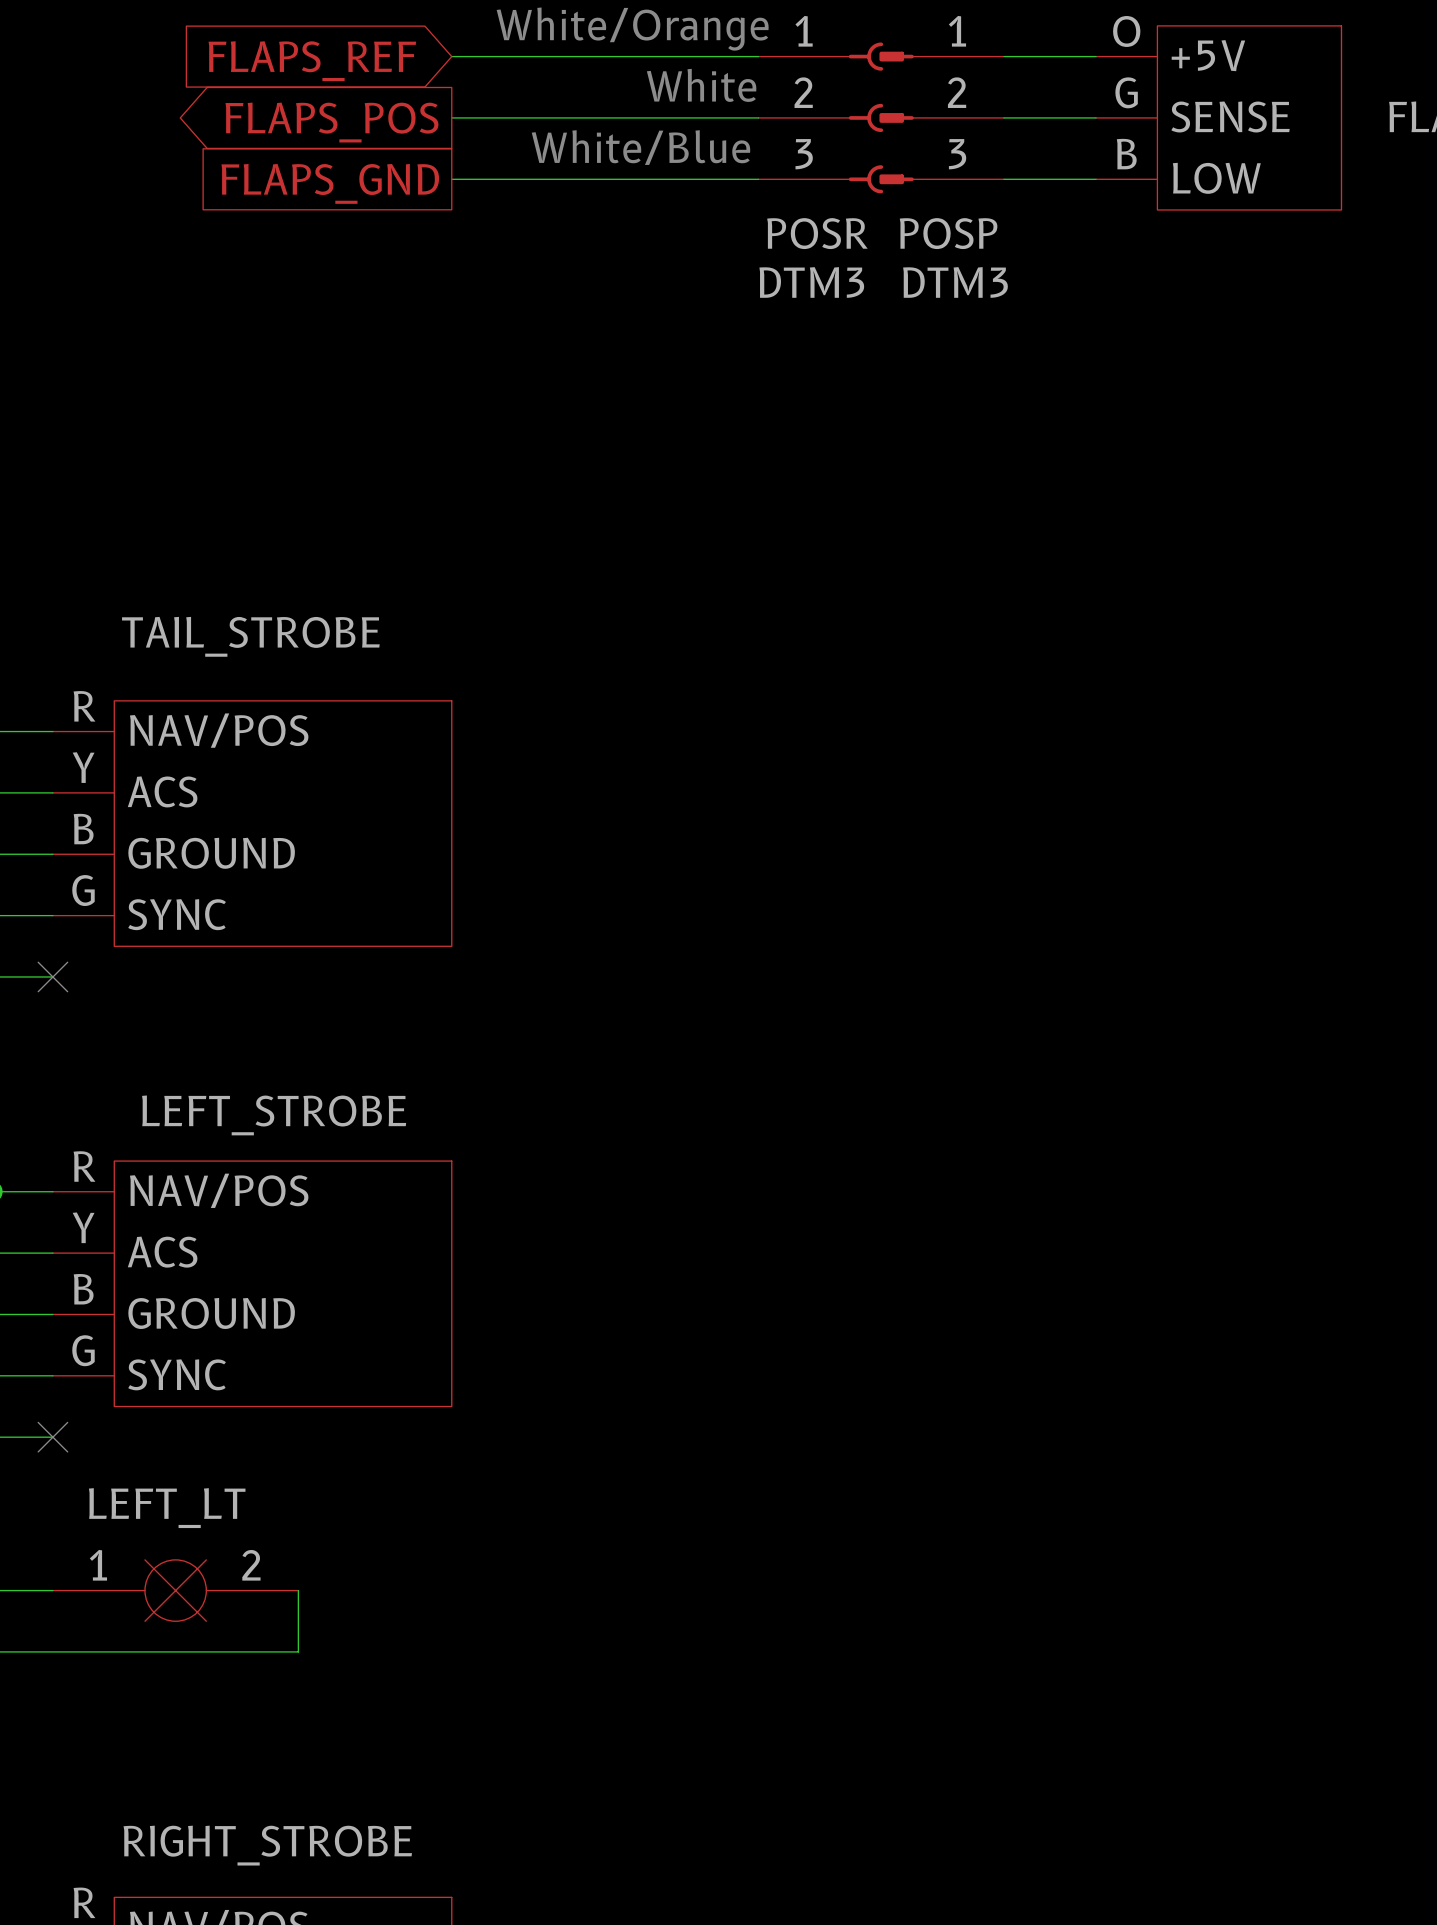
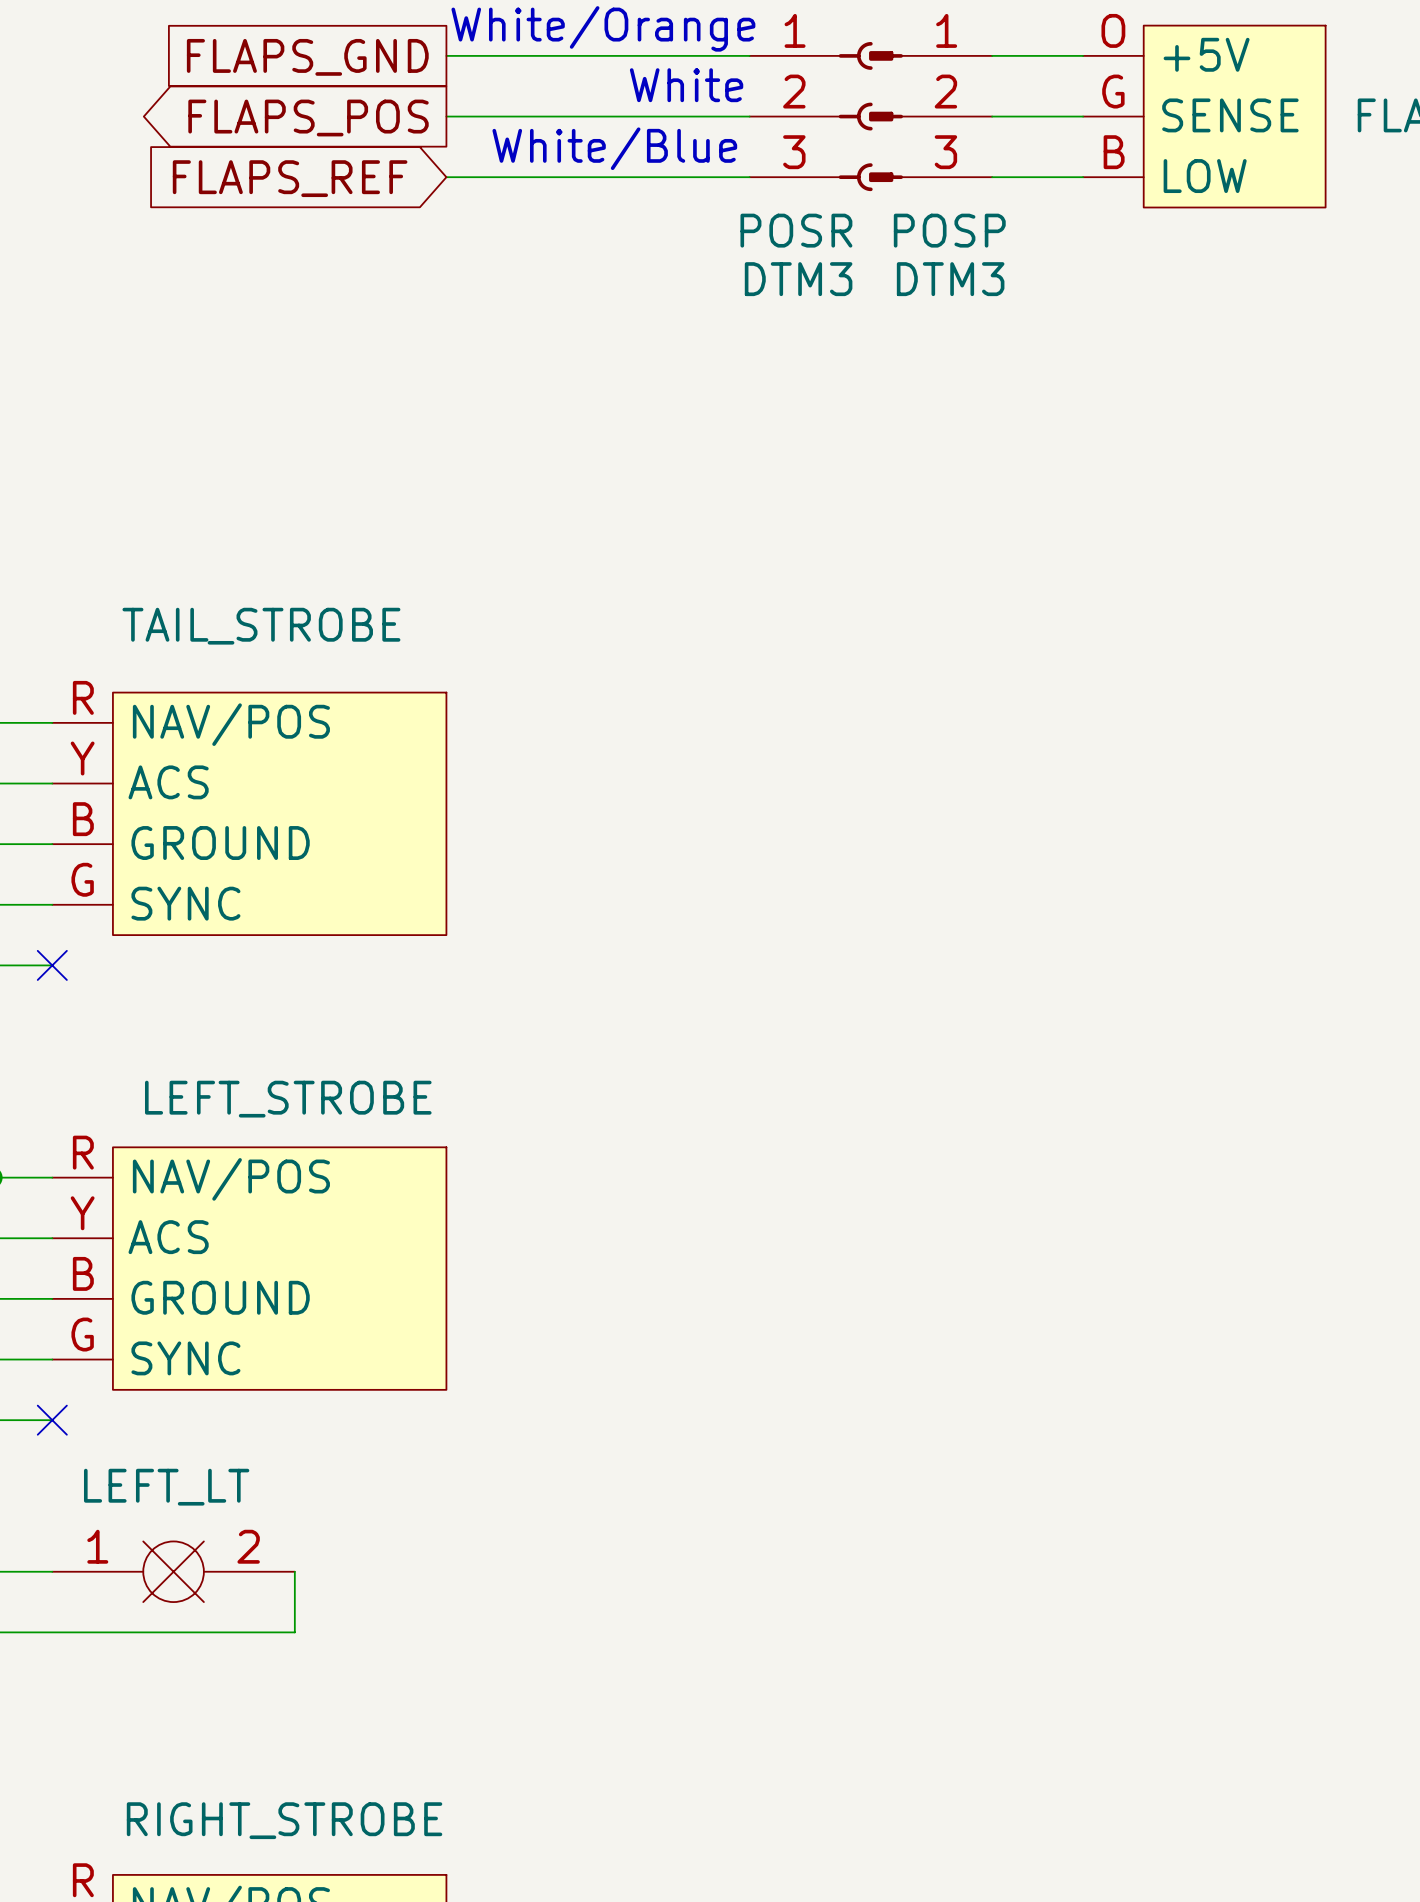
global label shape: input (312, 61) -> passive (307, 57)
global label: FLAPS_REF (312, 61) -> FLAPS_GND (307, 57)
global label shape: passive (330, 183) -> input (290, 178)
global label: FLAPS_GND (330, 183) -> FLAPS_REF (290, 178)

